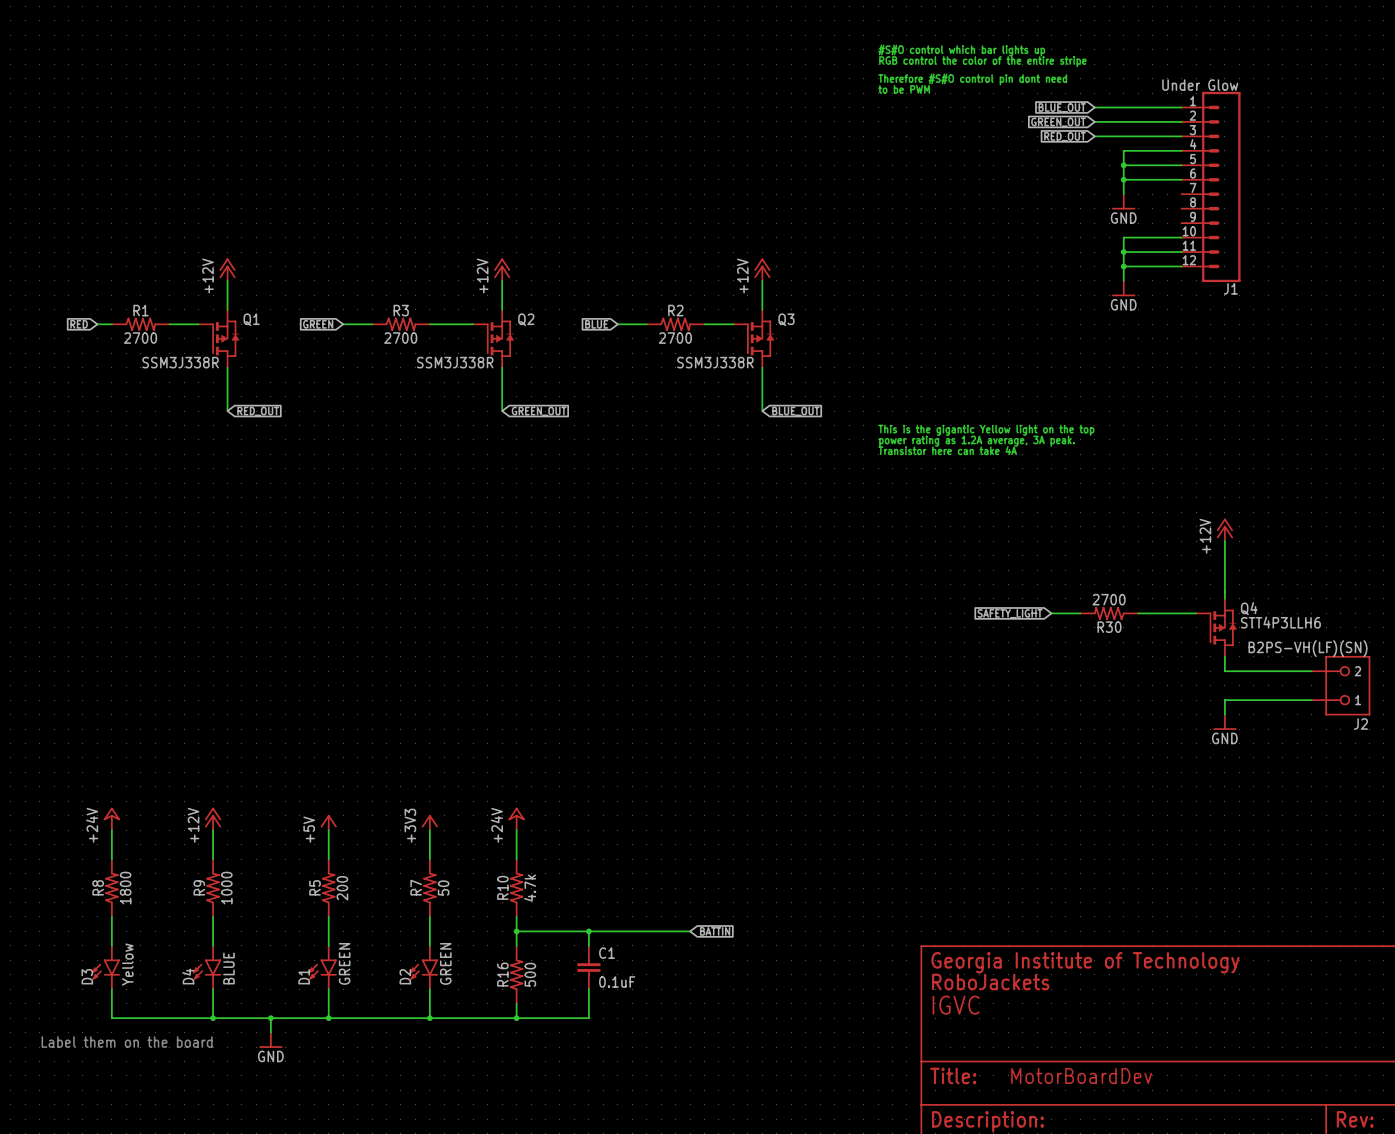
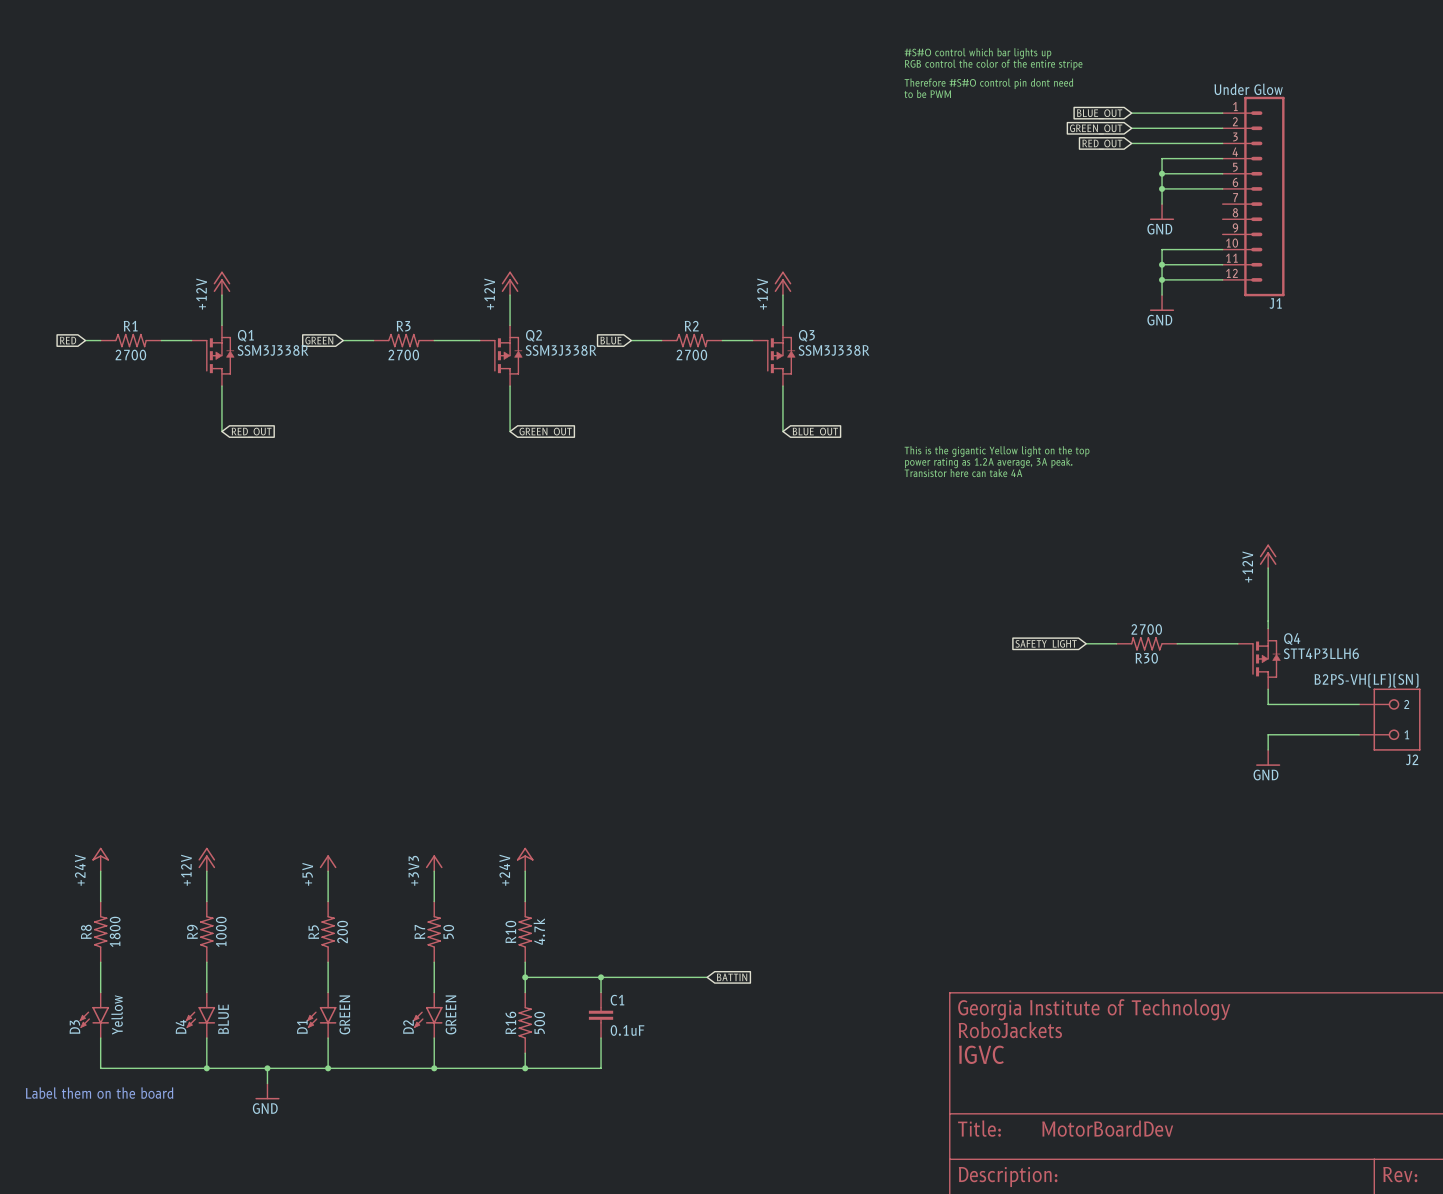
Q1 value position: SSM3J338R (180, 362) -> SSM3J338R (273, 350)
Q2 value position: SSM3J338R (455, 362) -> SSM3J338R (561, 350)
Q3 value position: SSM3J338R (715, 362) -> SSM3J338R (834, 350)

